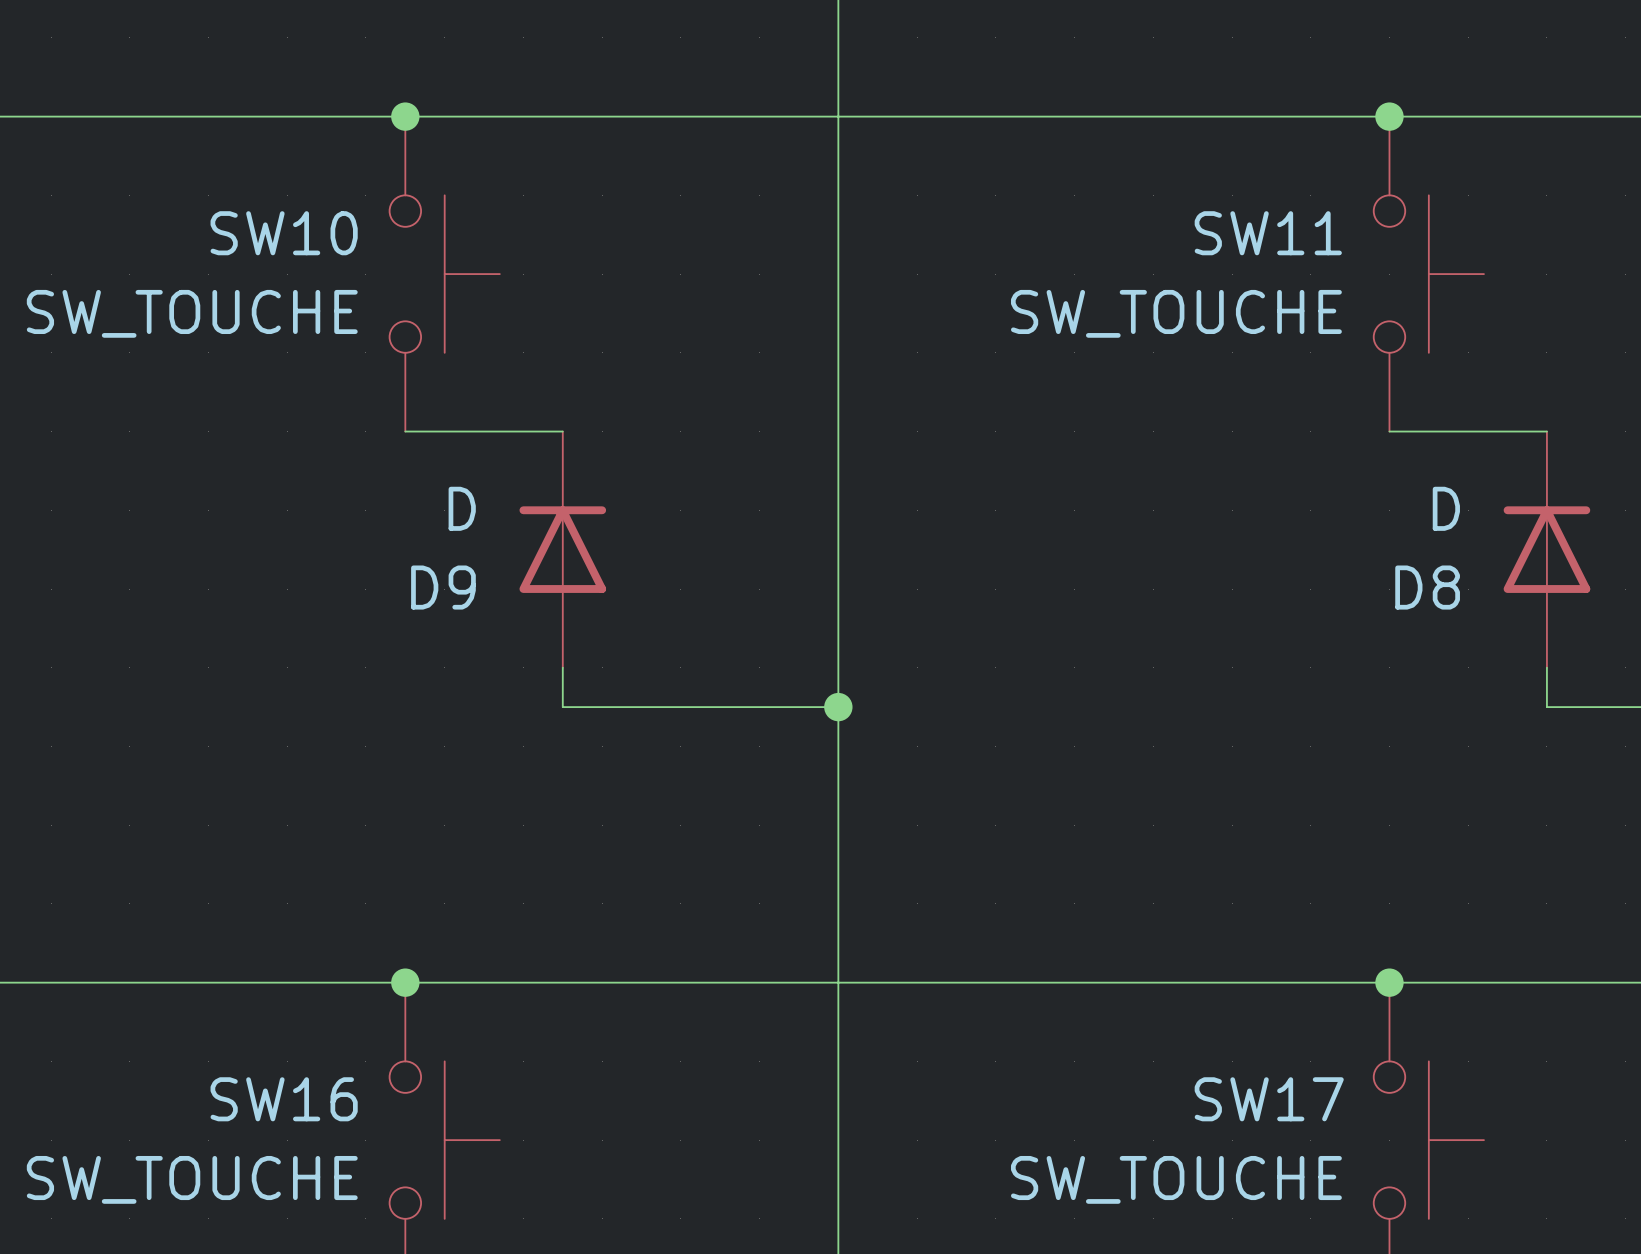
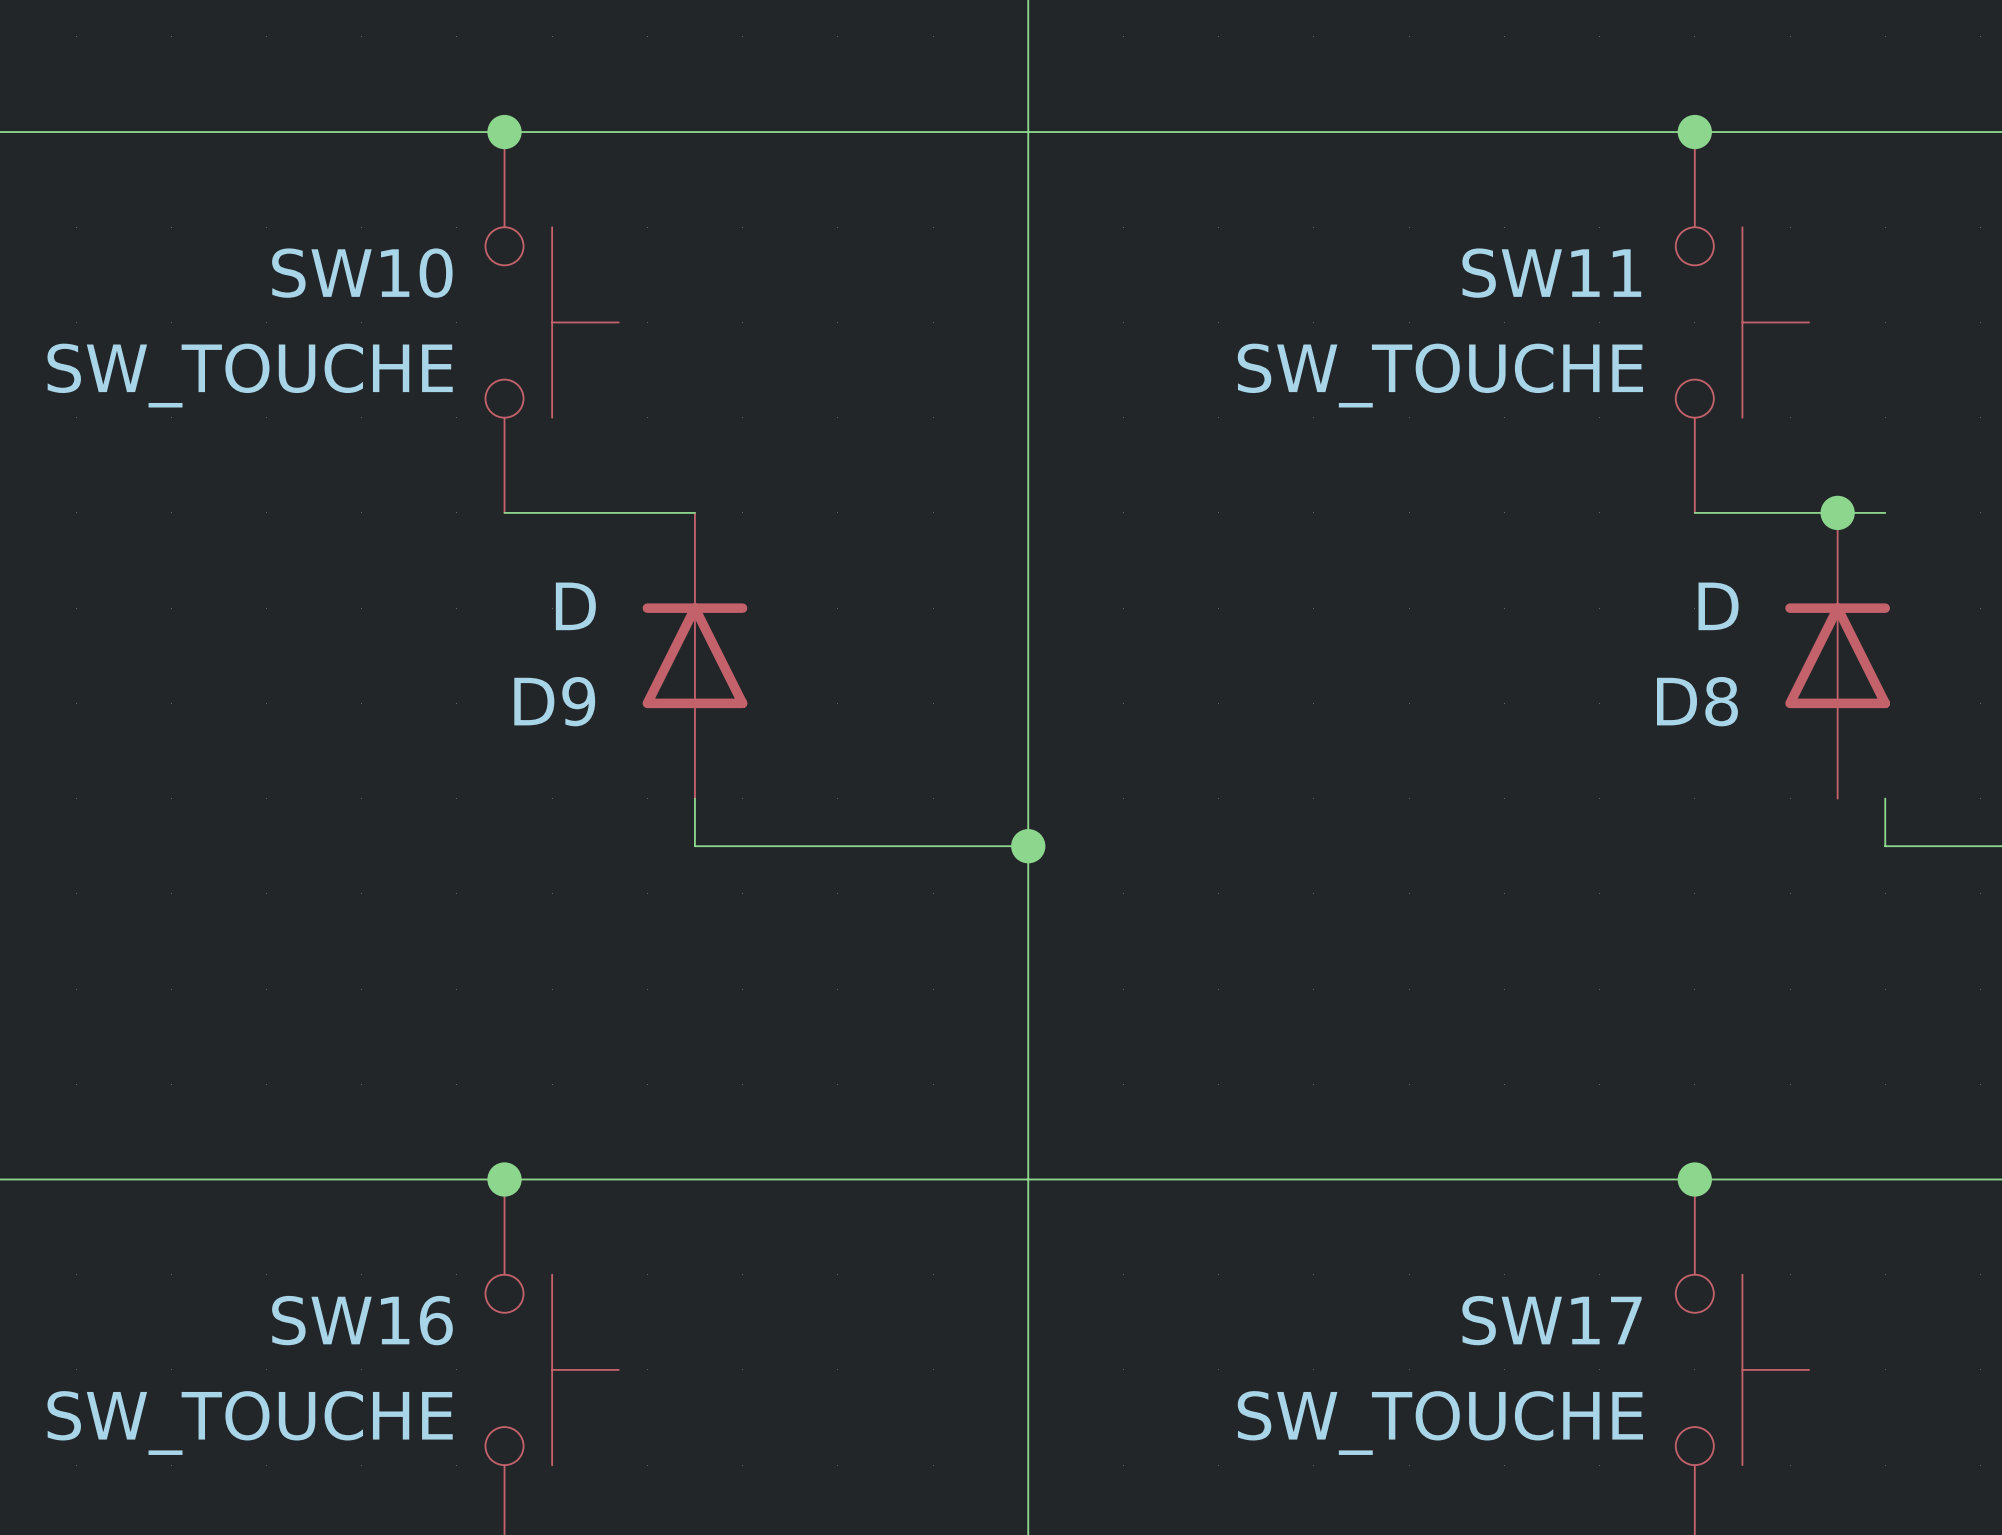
junction: none -> (1837, 512)
D8 position: (1546, 549) -> (1837, 655)

